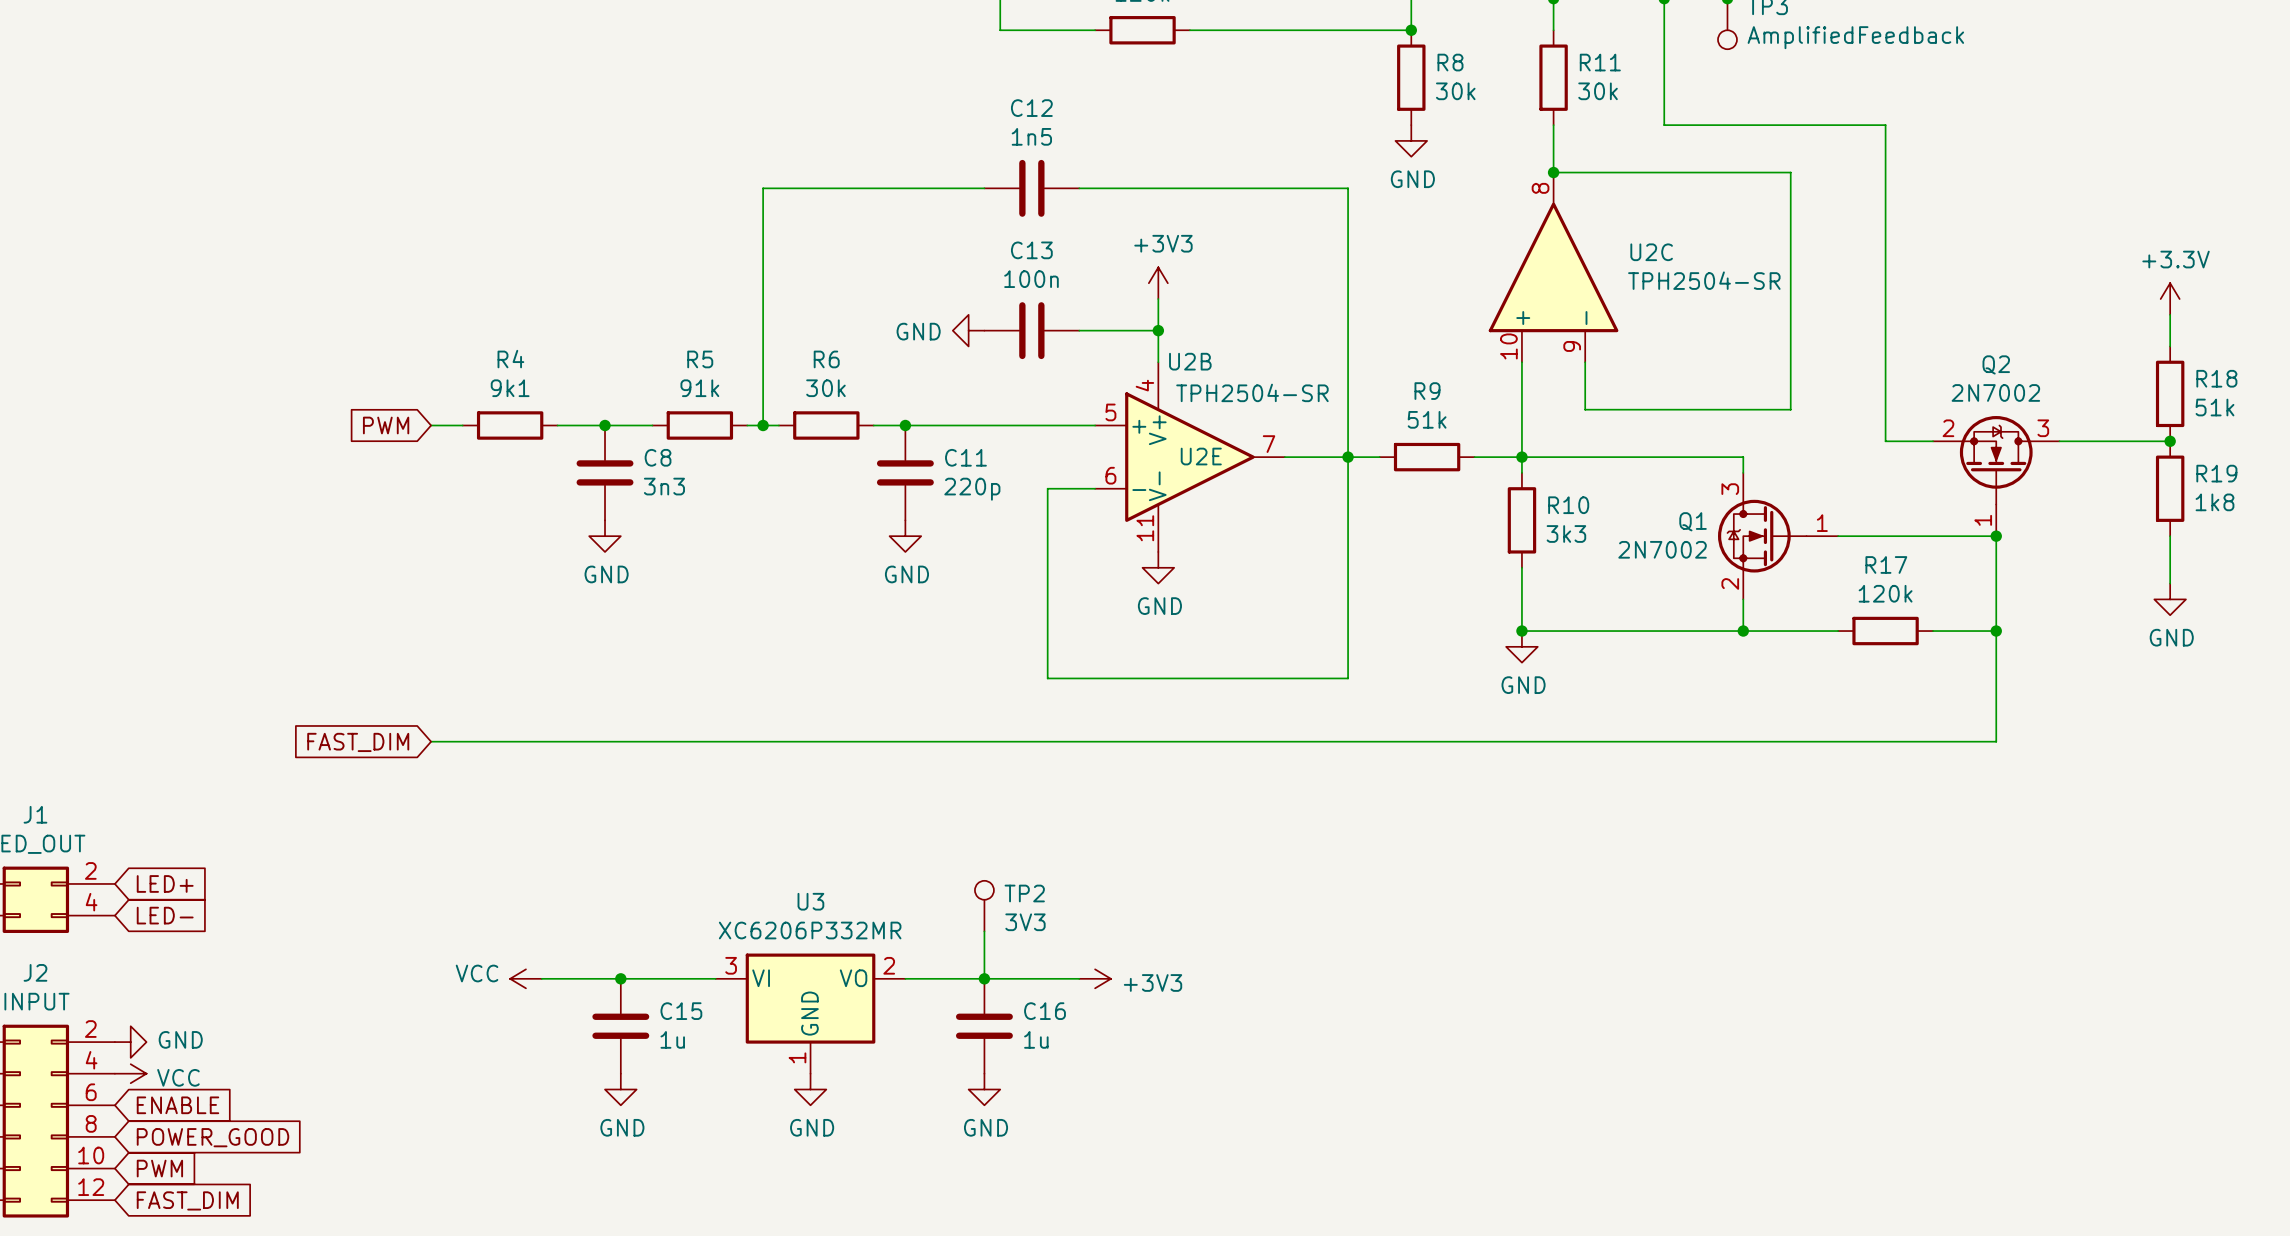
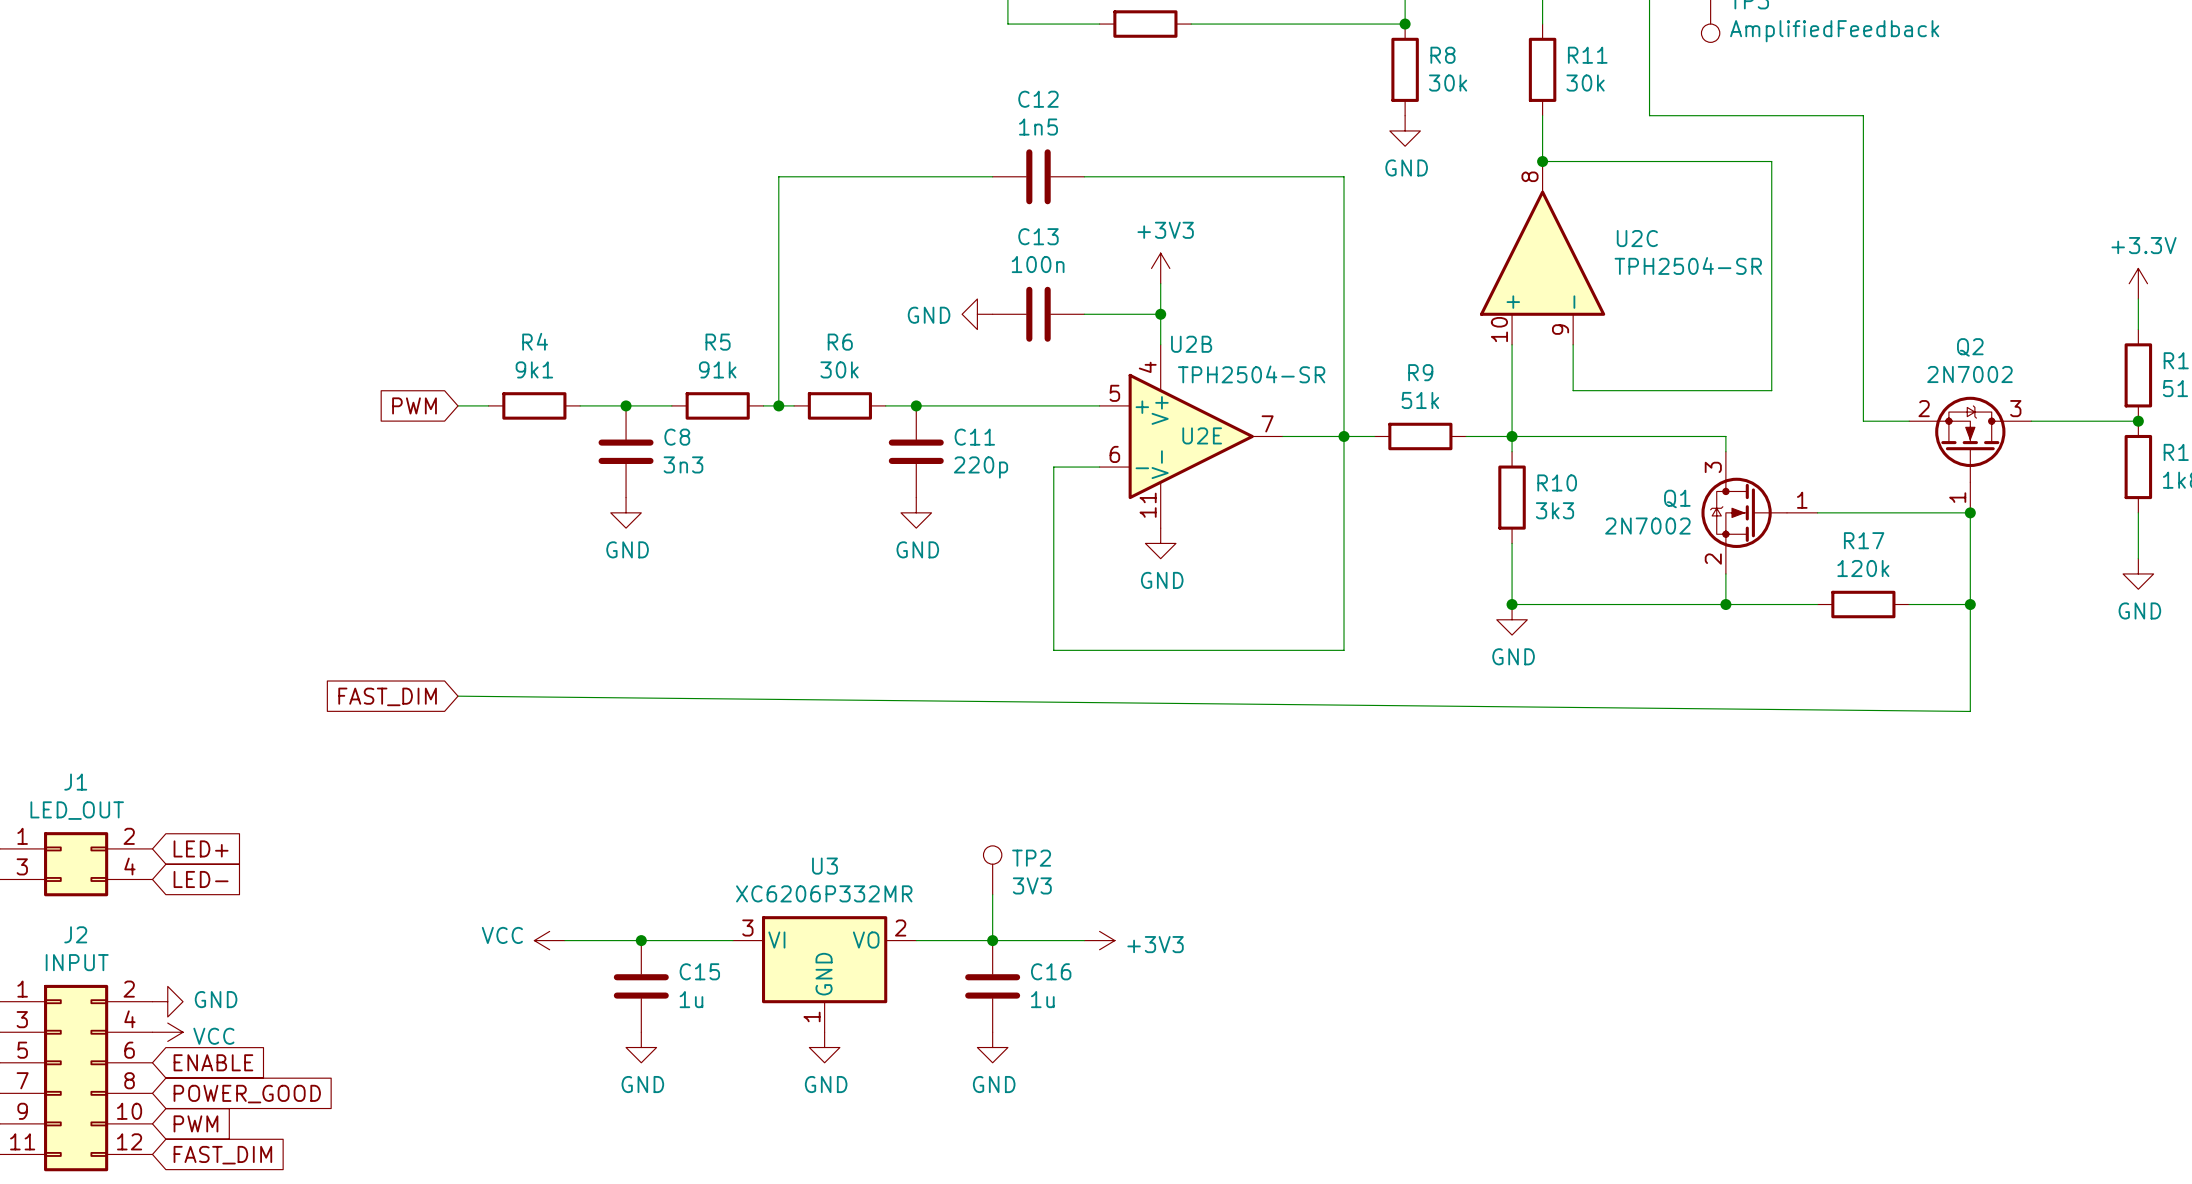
wire: (431, 741) (1996, 741) -> (458, 696) (1970, 711)
global label position: FAST_DIM (358, 742) -> FAST_DIM (387, 696)

